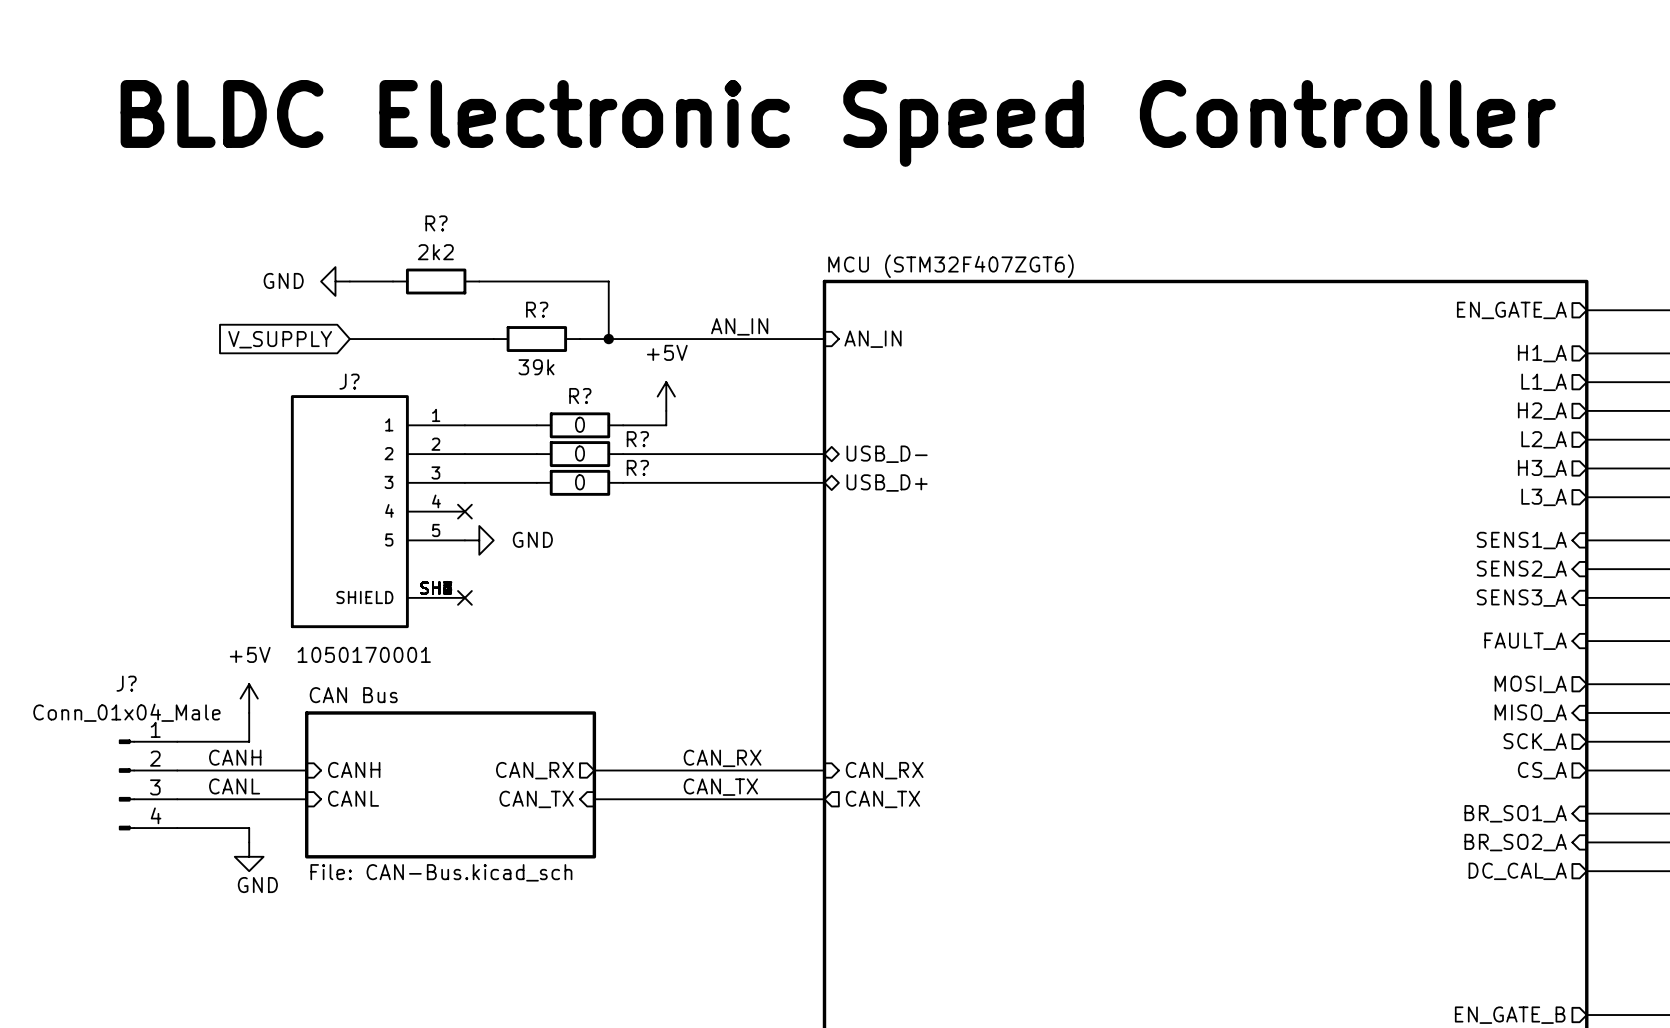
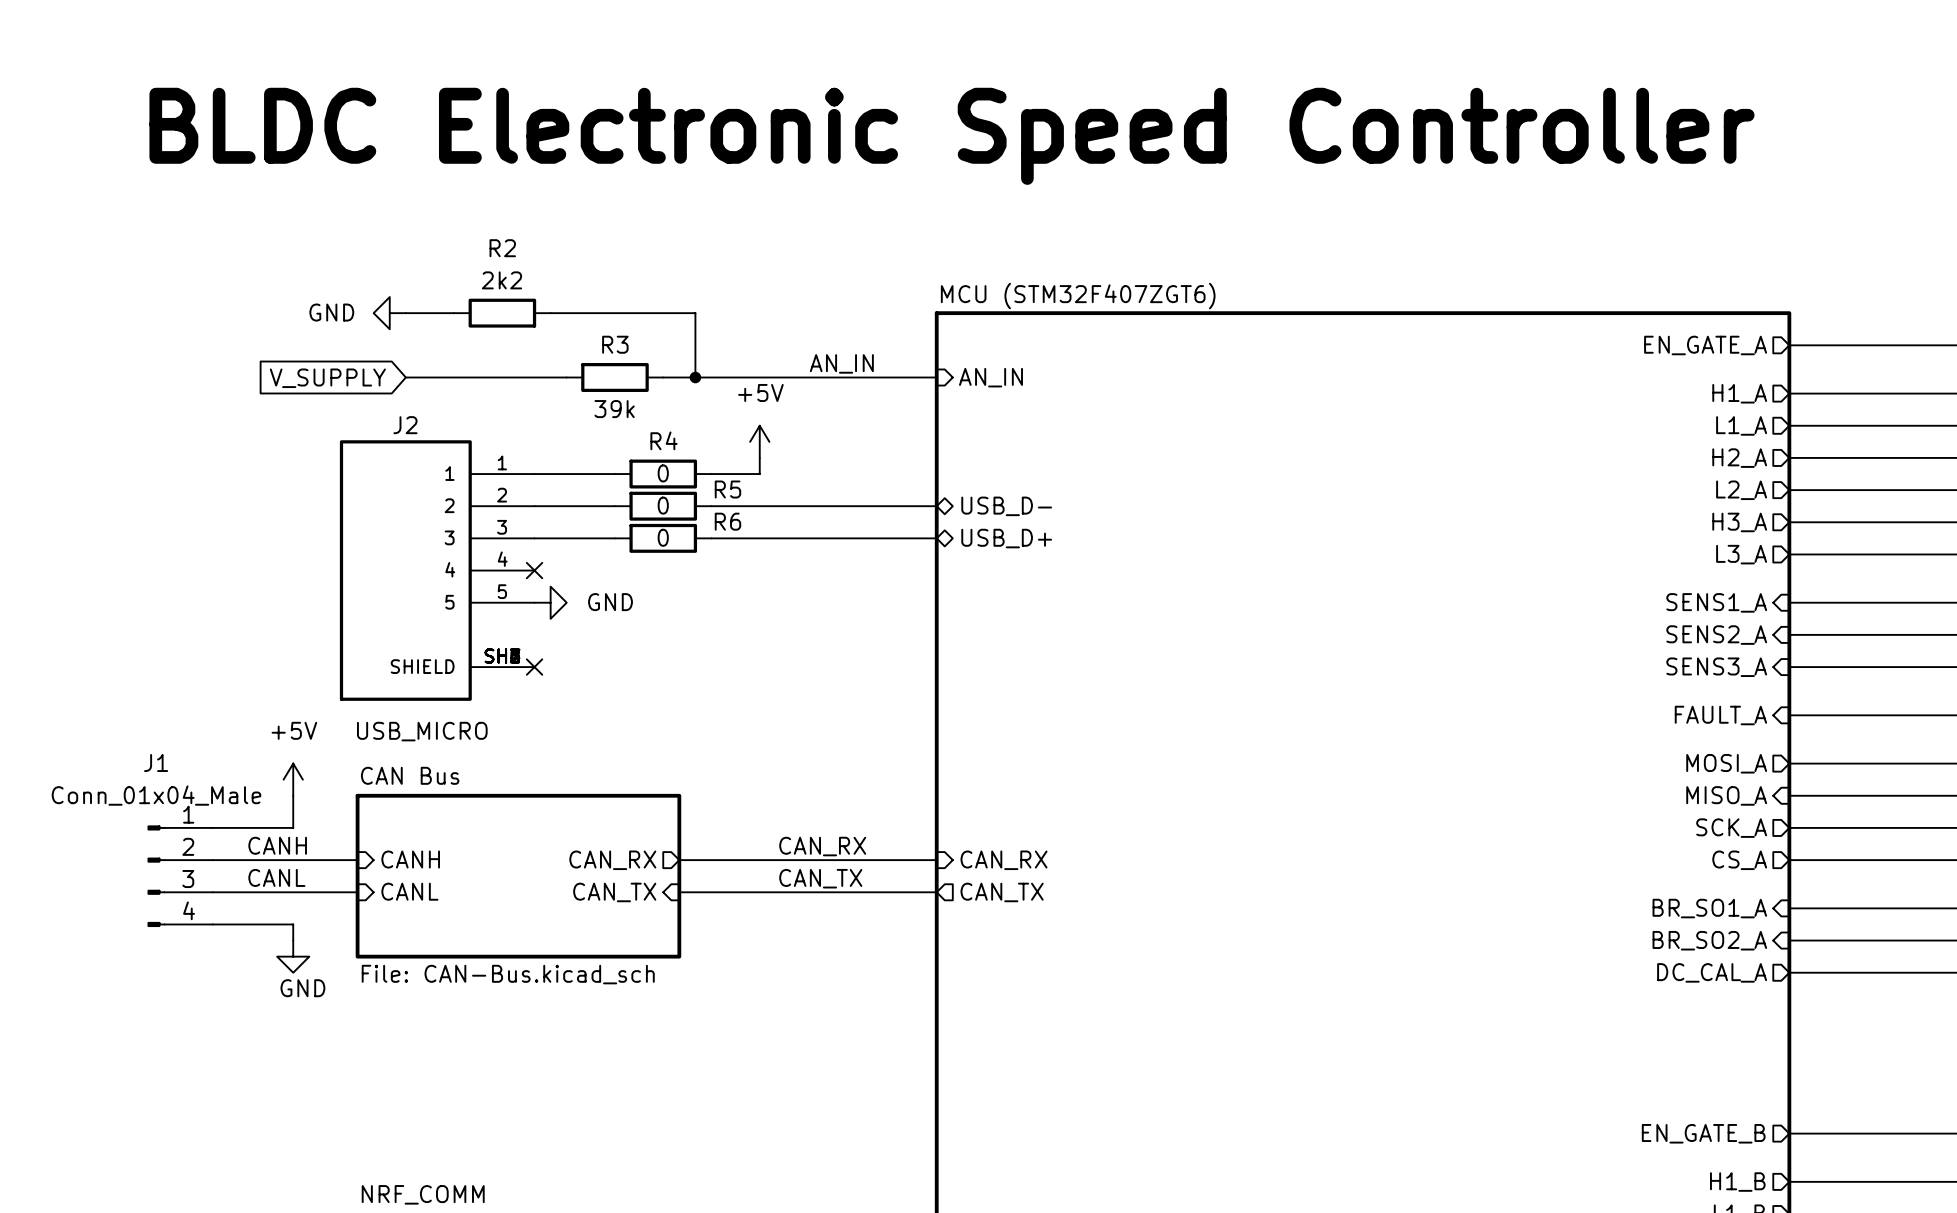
R? name: R? (436, 223) -> R2 (502, 248)
R? name: R? (537, 309) -> R3 (615, 344)
J? name: J? (349, 381) -> J2 (405, 425)
R? name: R? (580, 396) -> R4 (664, 440)
R? name: R? (637, 439) -> R5 (727, 489)
R? name: R? (637, 467) -> R6 (727, 521)
J? value: 1050170001 (364, 654) -> USB_MICRO (422, 731)
J? name: J? (126, 683) -> J1 (156, 762)

